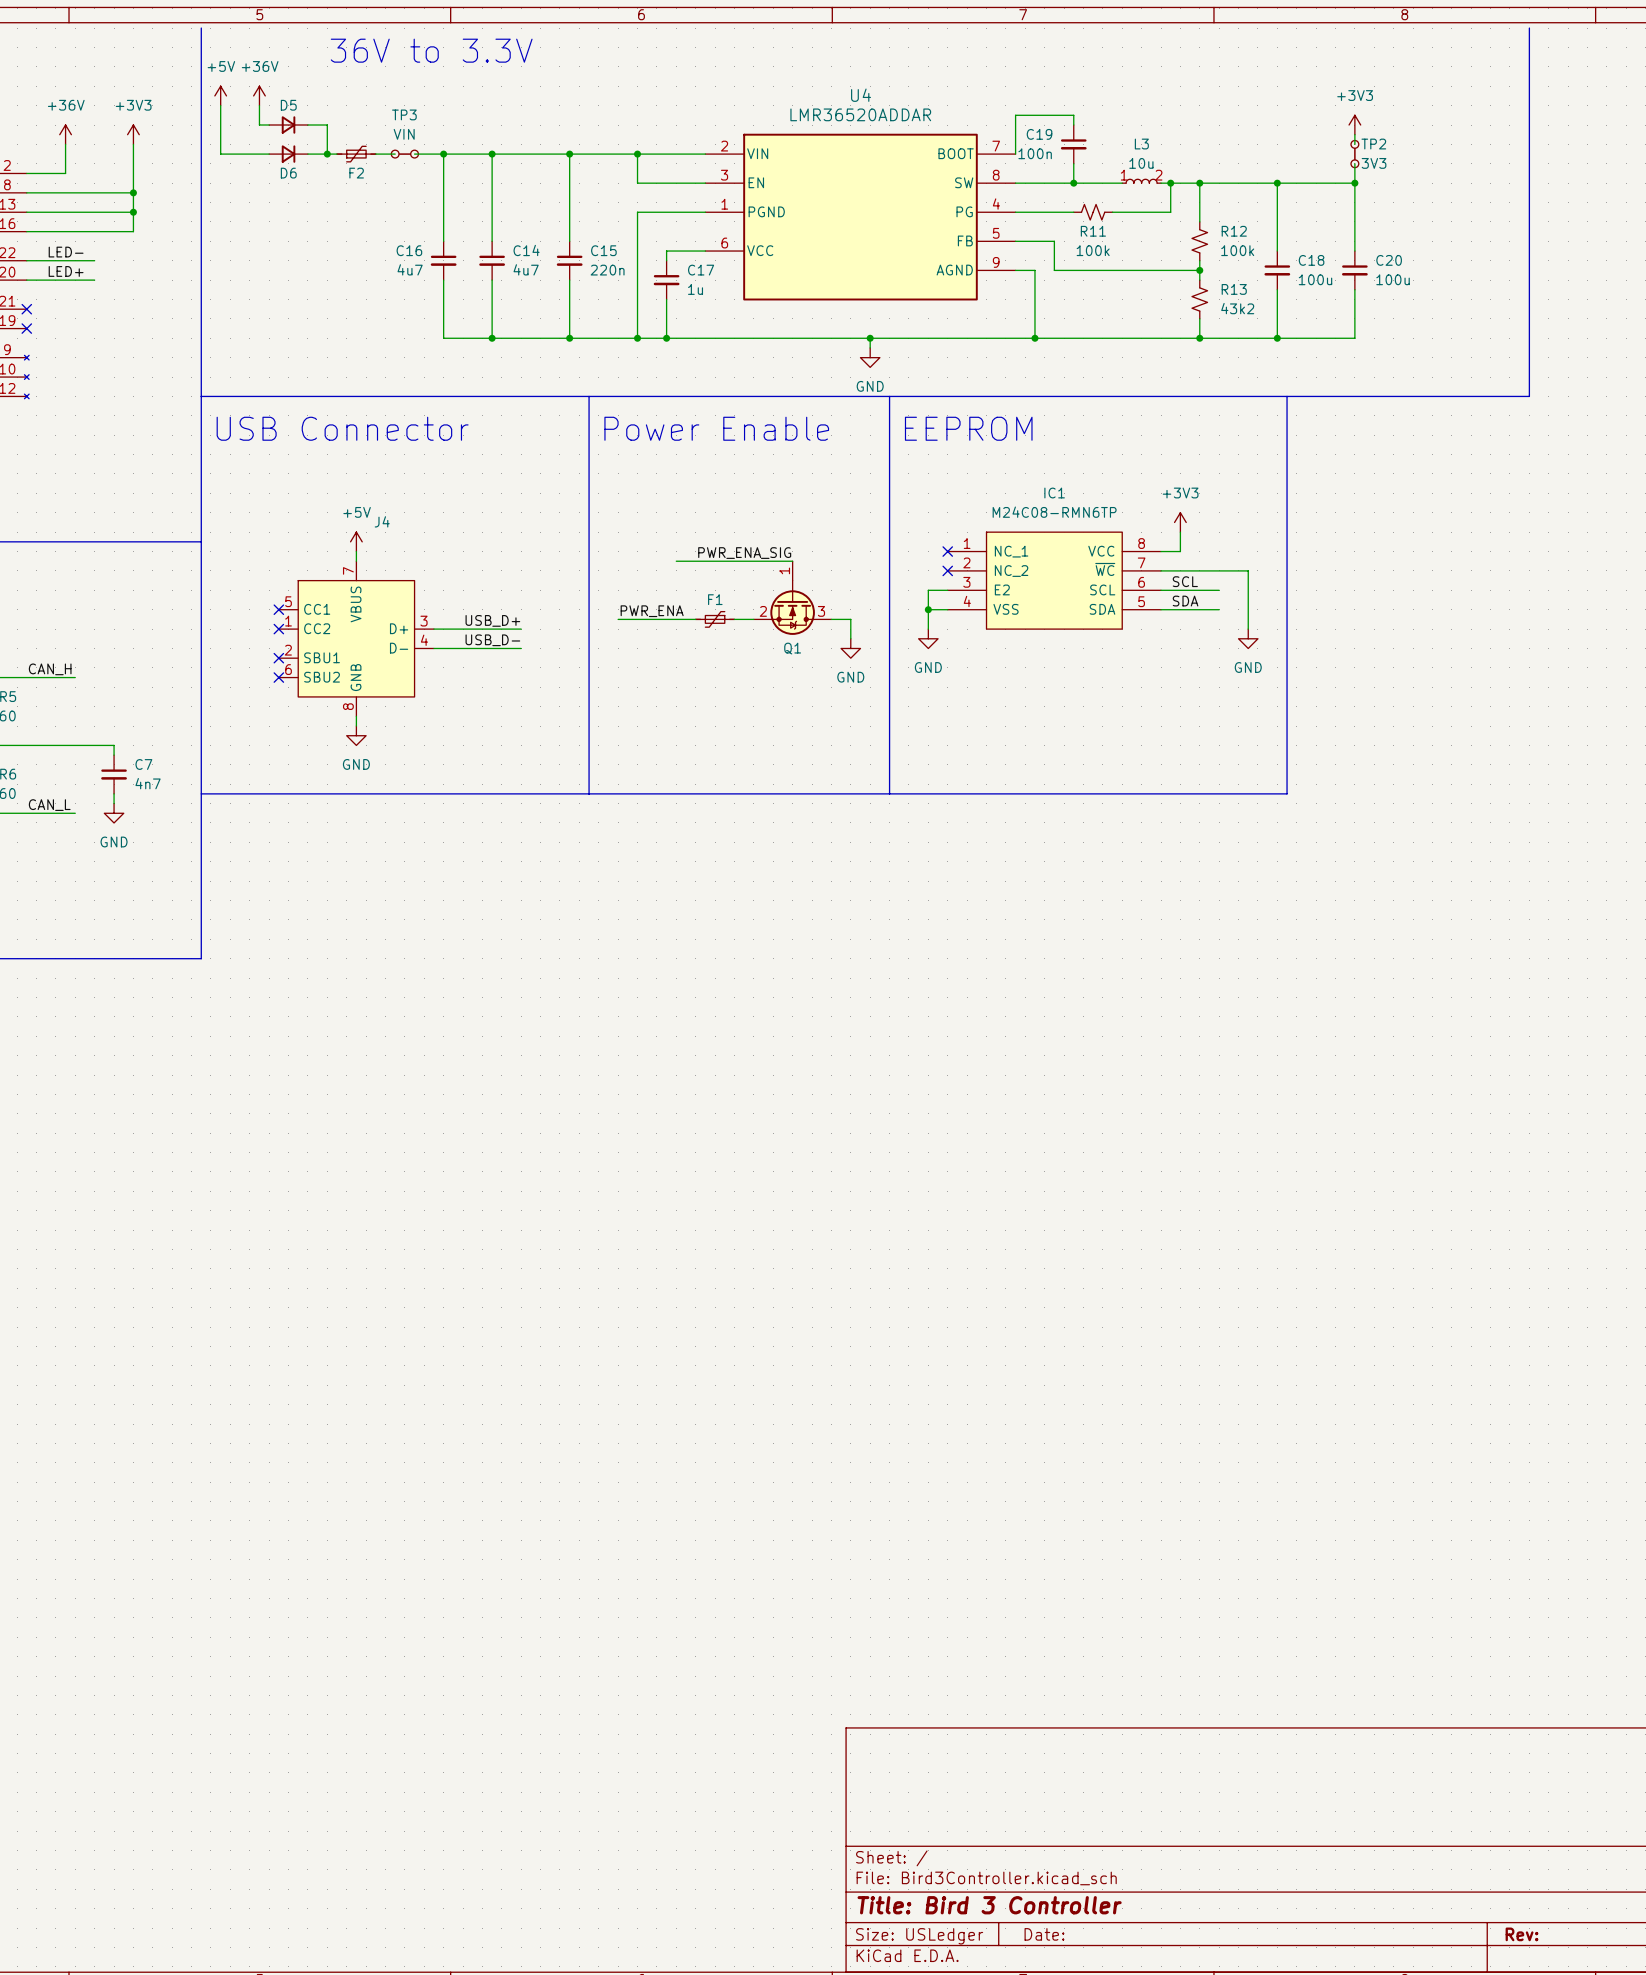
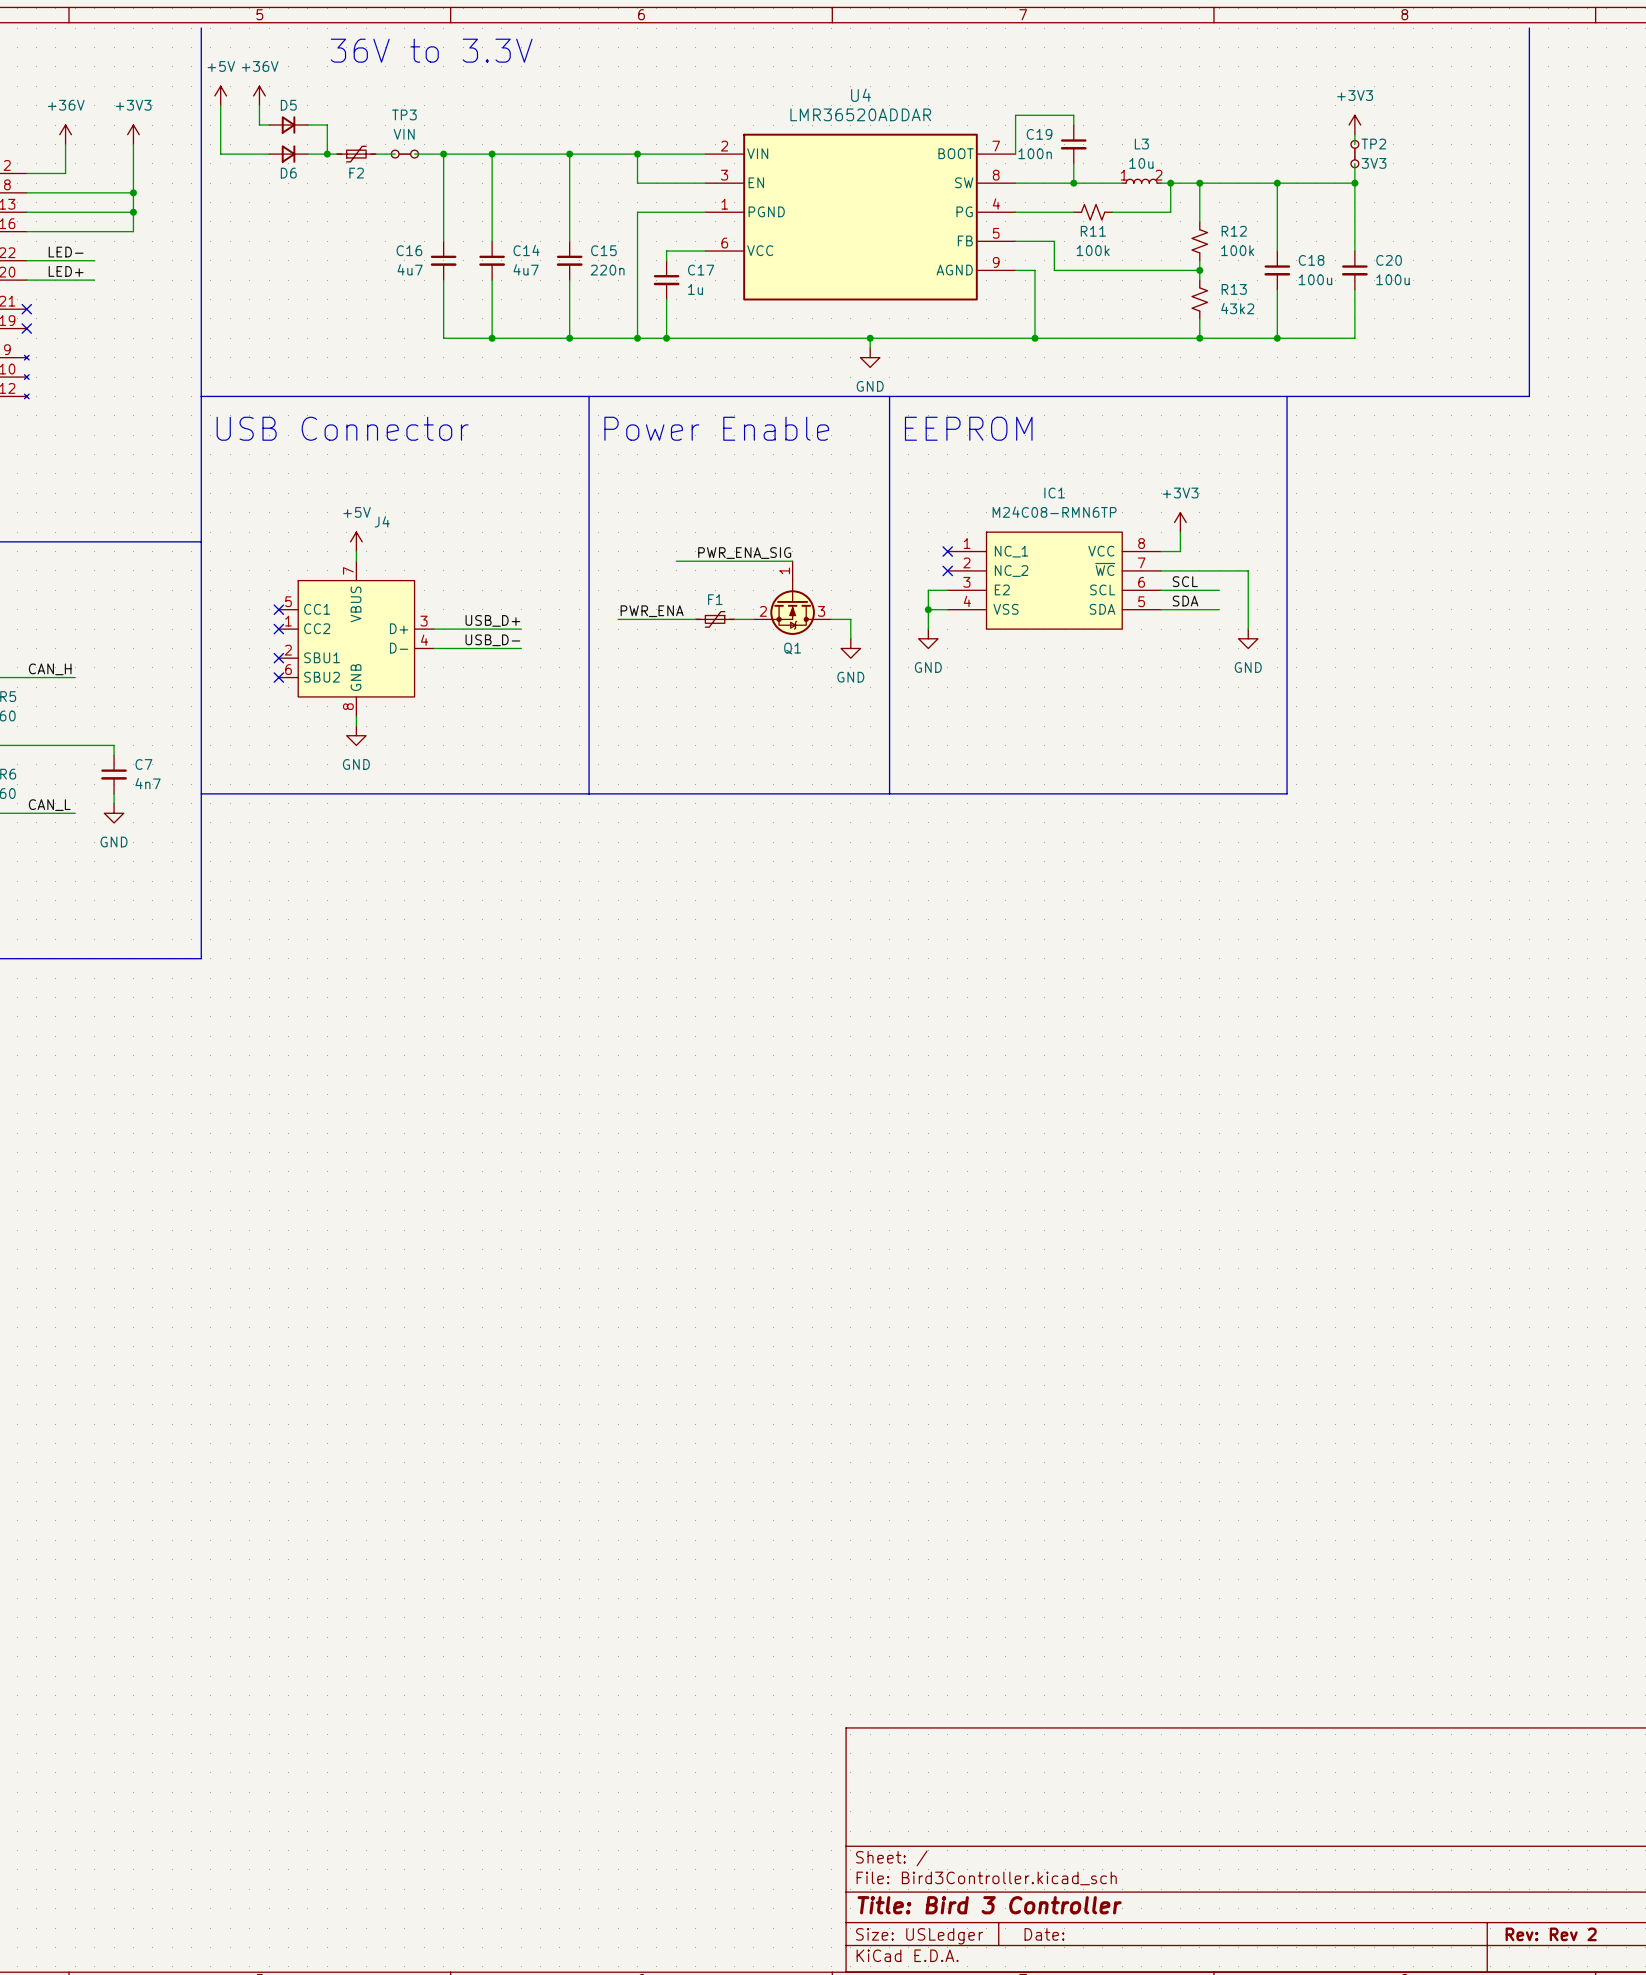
title block: Rev: (1522, 1934) -> Rev: Rev 2 (1551, 1934)

